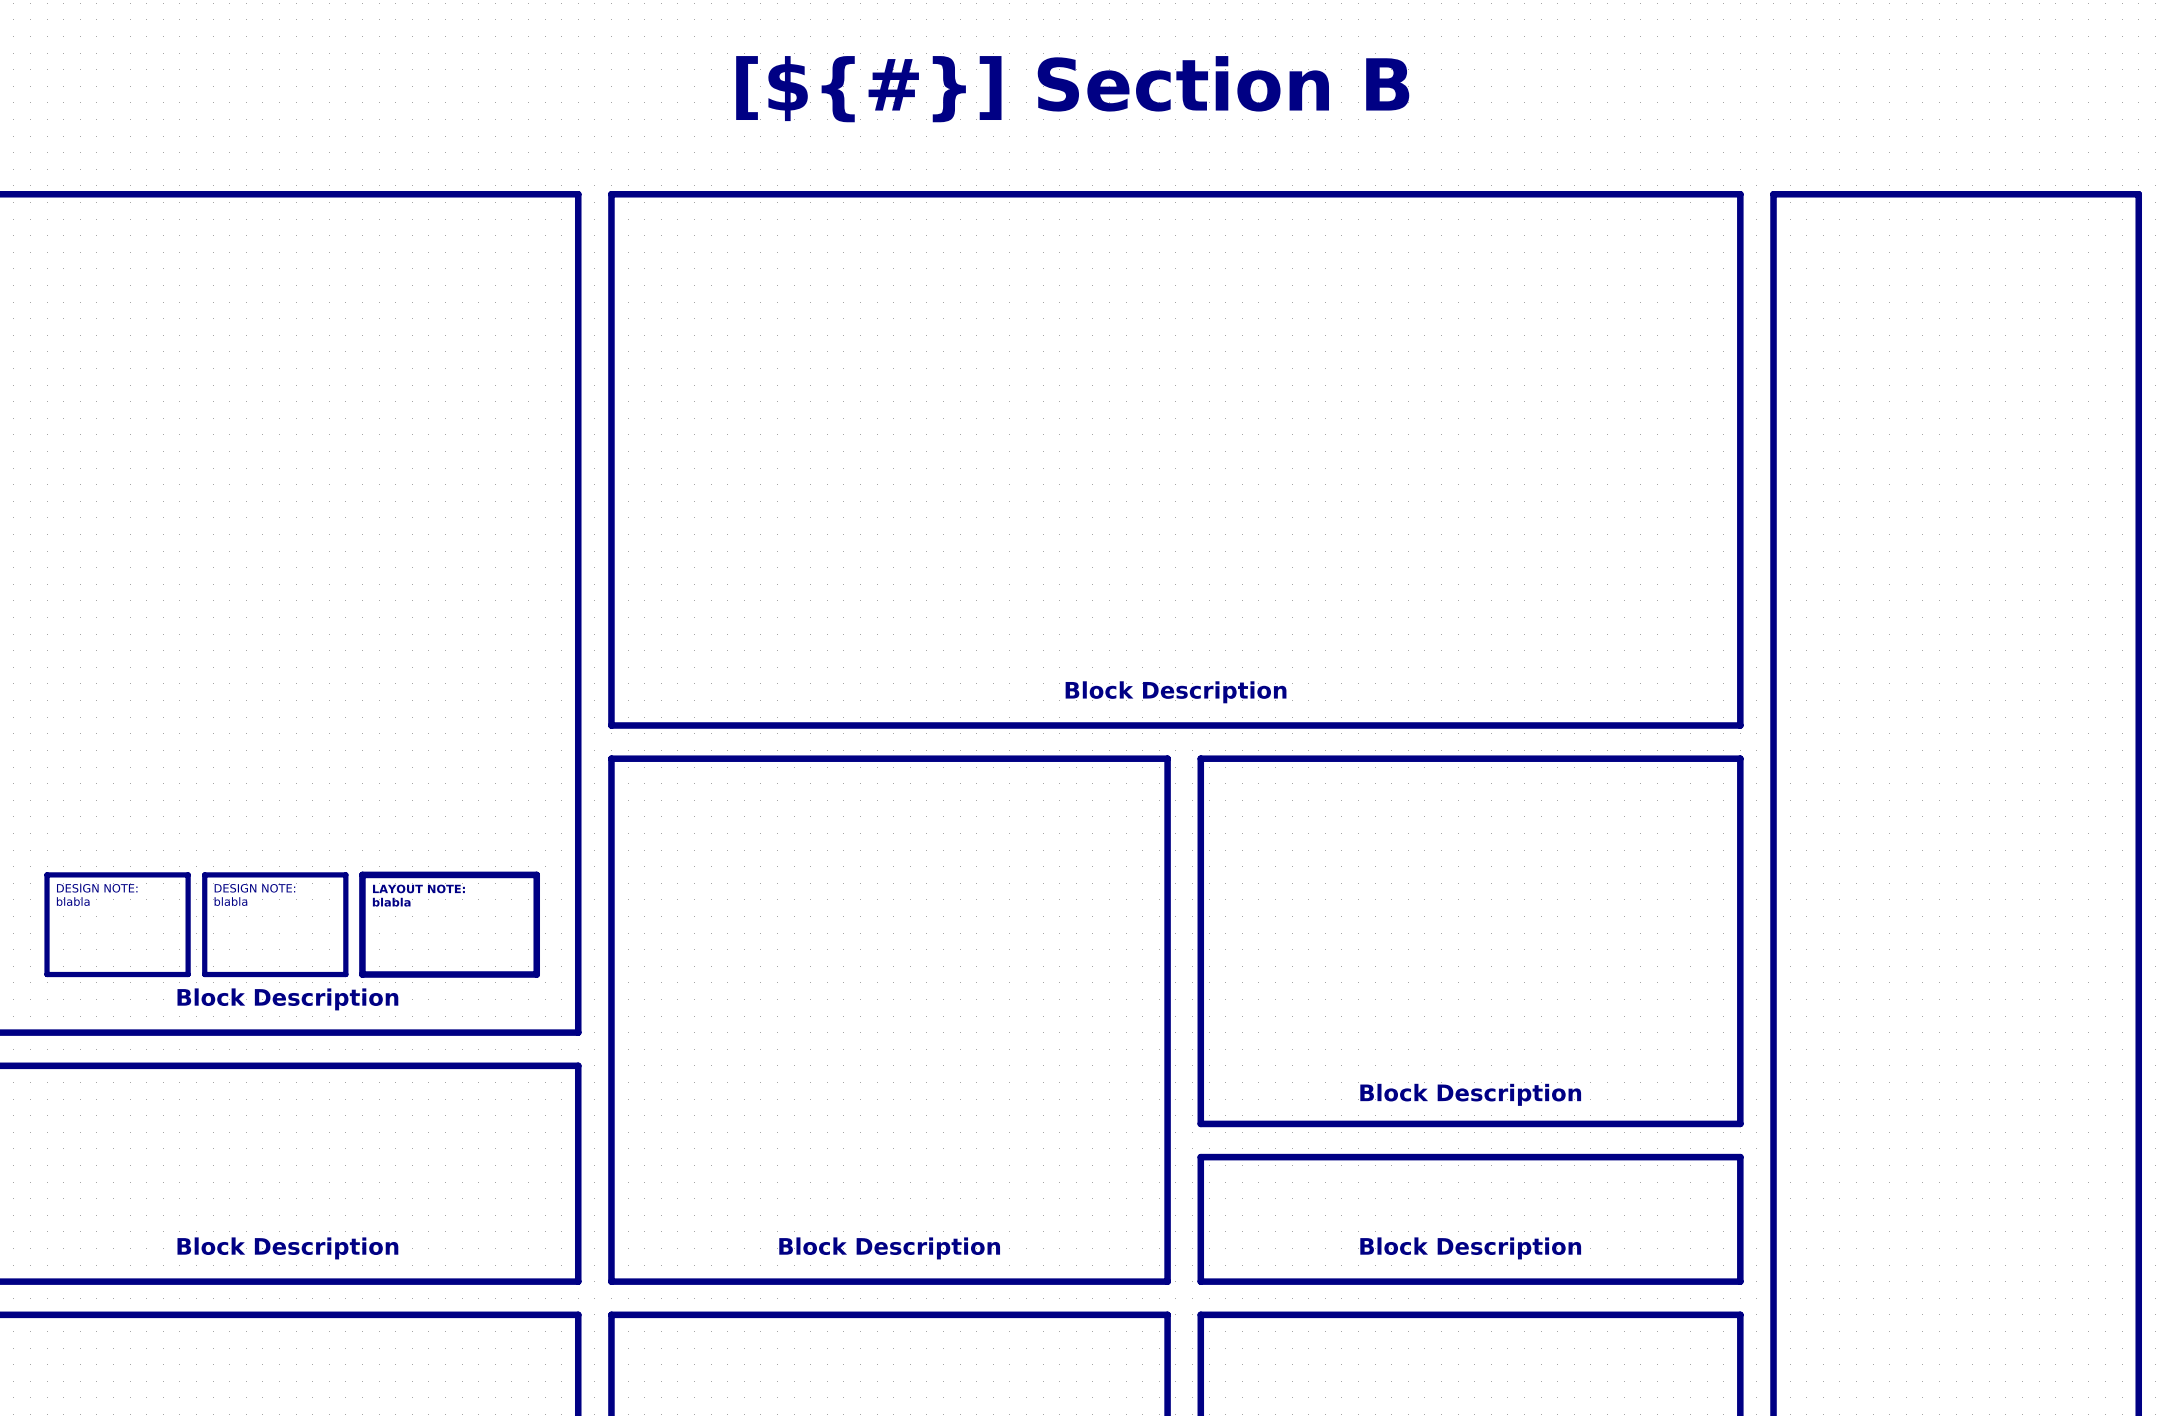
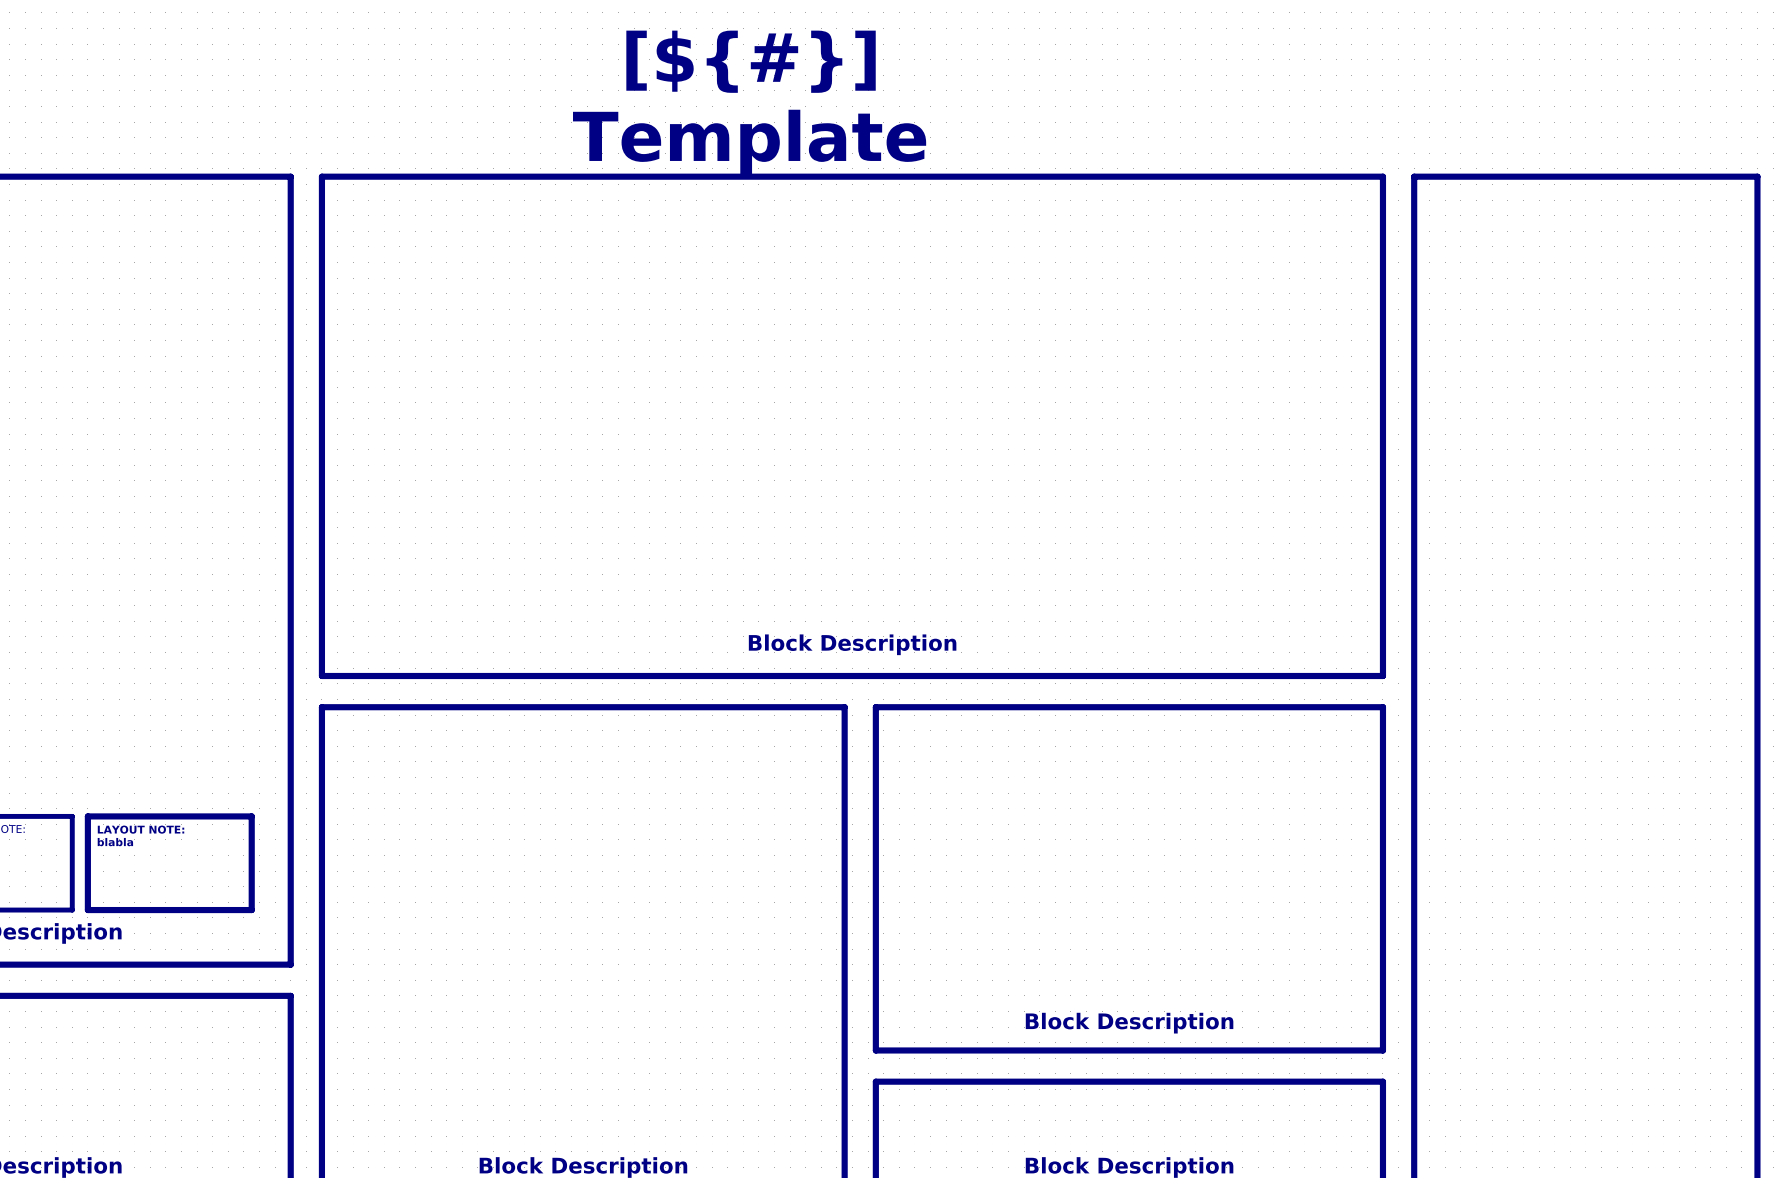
text: none -> [${#}] (751, 61)
text: [${#}] Section B (1072, 89) -> none
text: none -> Template (749, 142)

